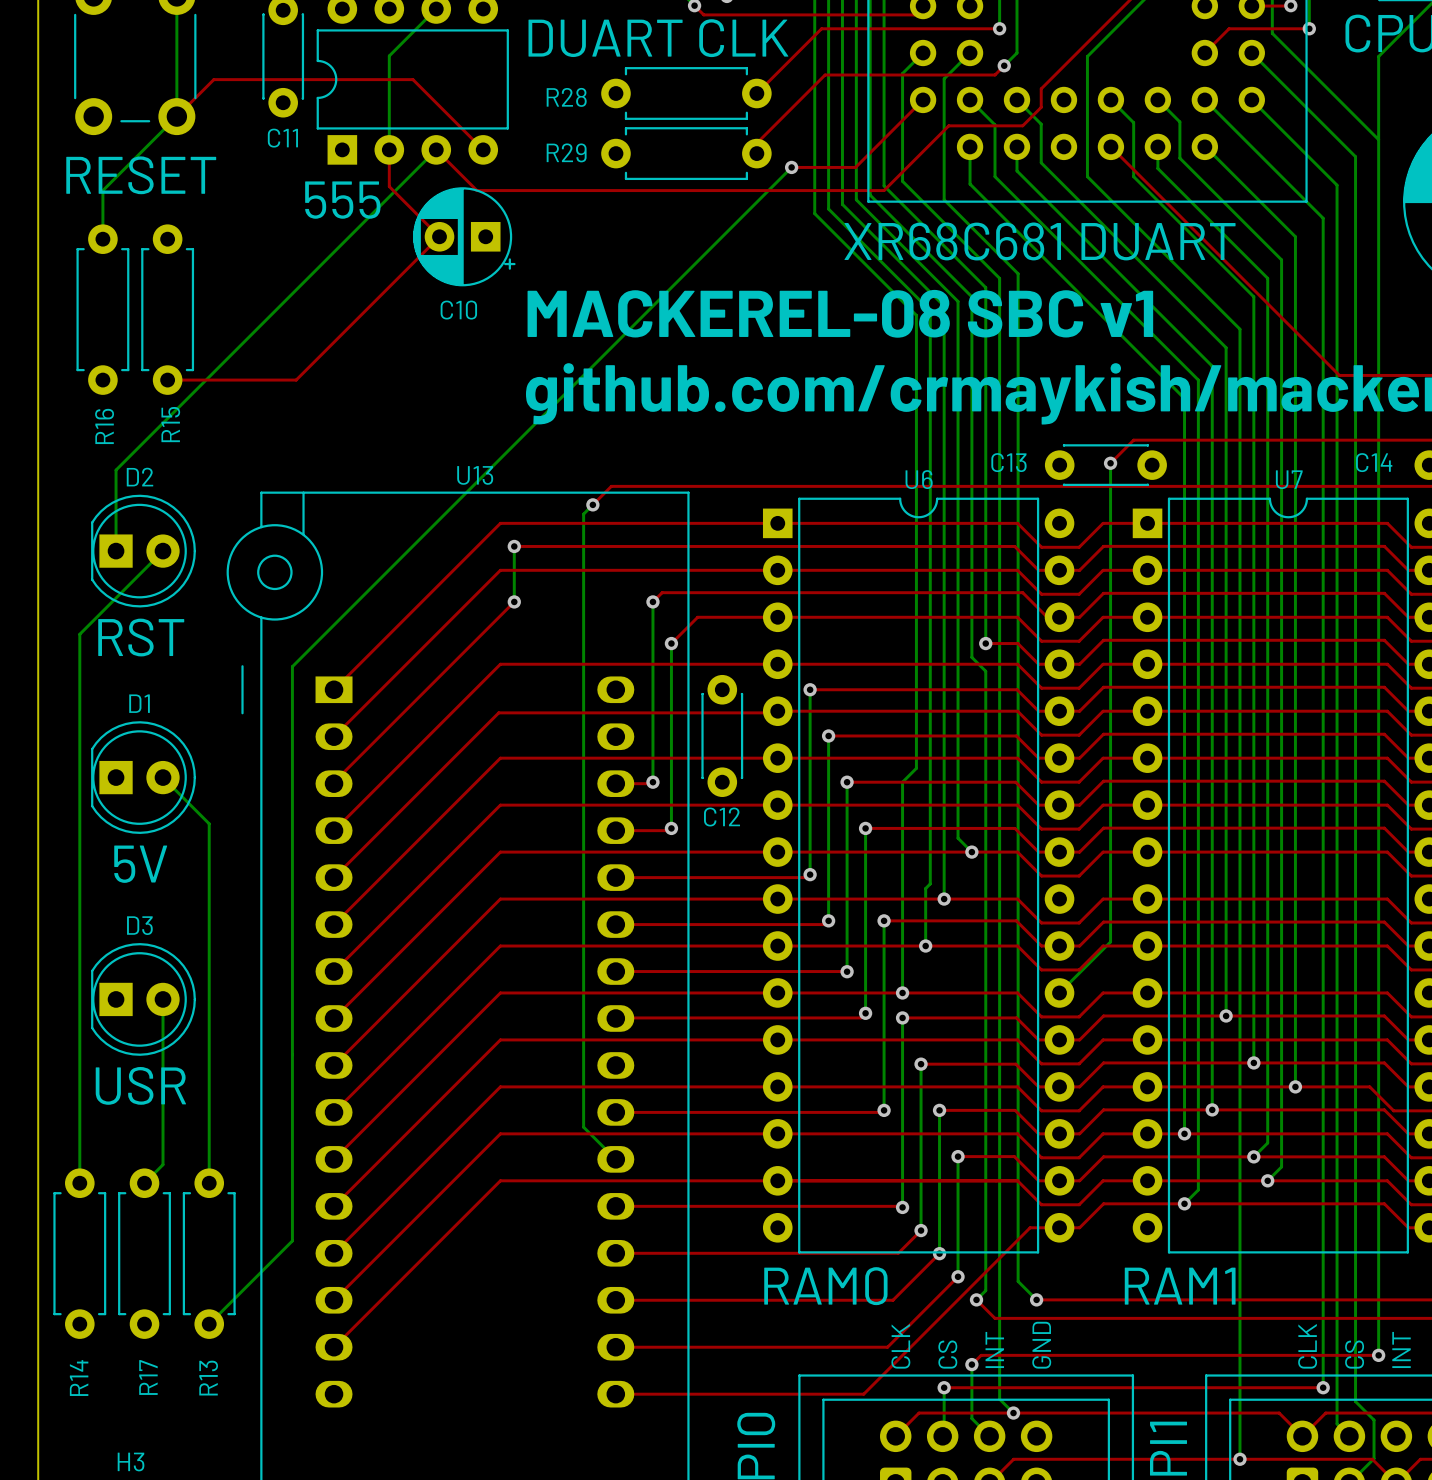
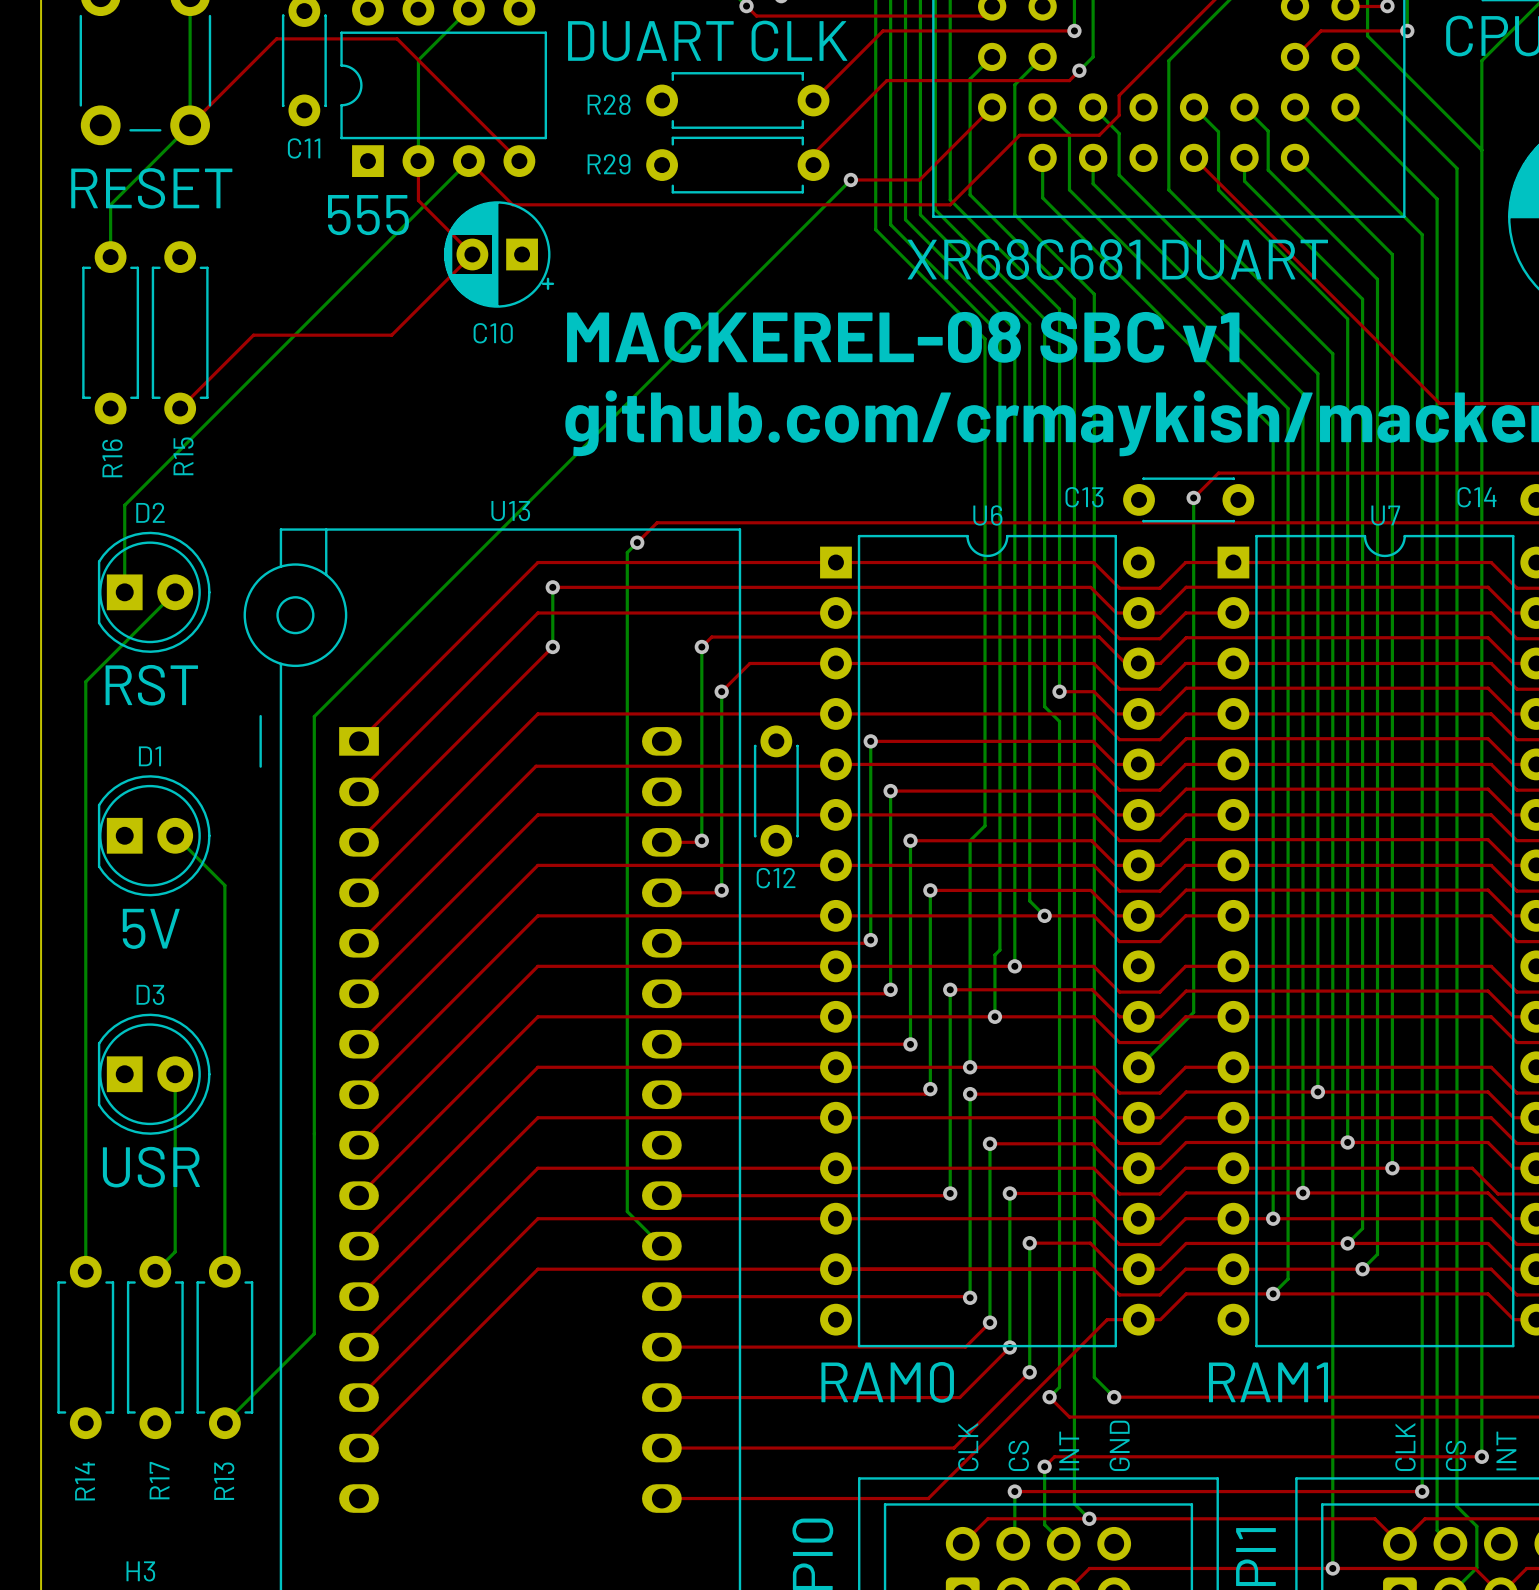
top track: (213, 79) (412, 79) -> (229, 85) (276, 38) (397, 38) (443, 85)
top track: (364, 311) (296, 380) (167, 380) -> (391, 335) (253, 335) (180, 408)

